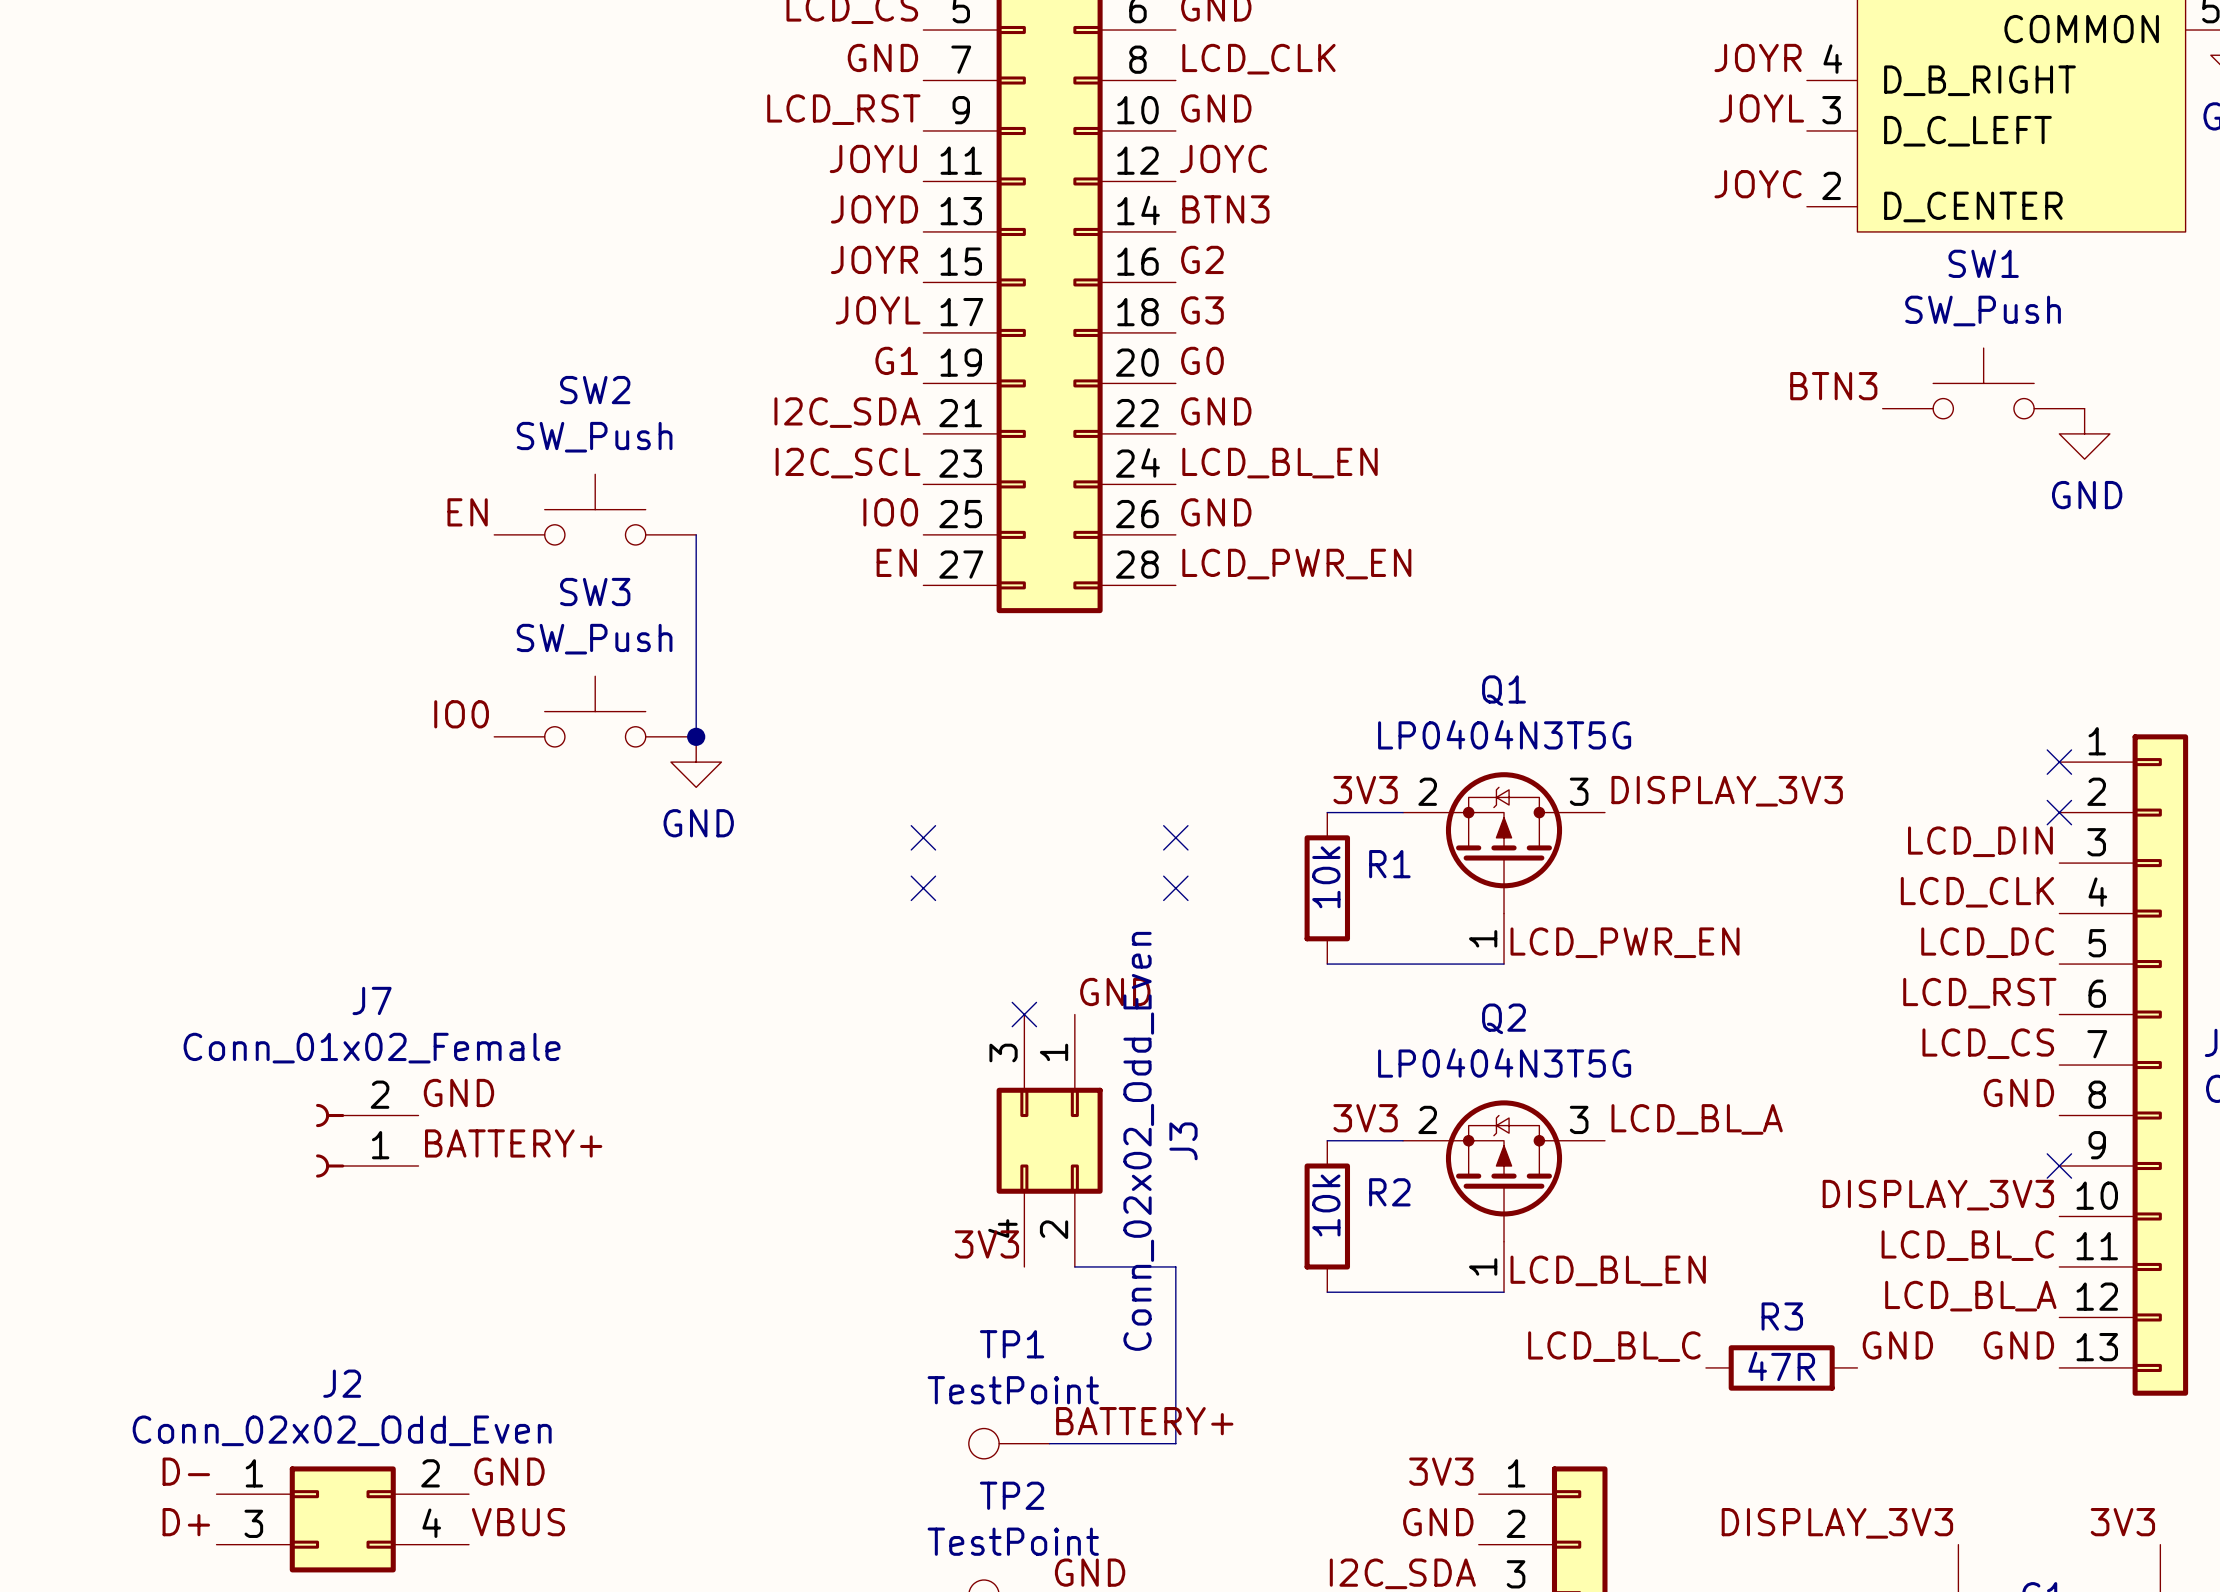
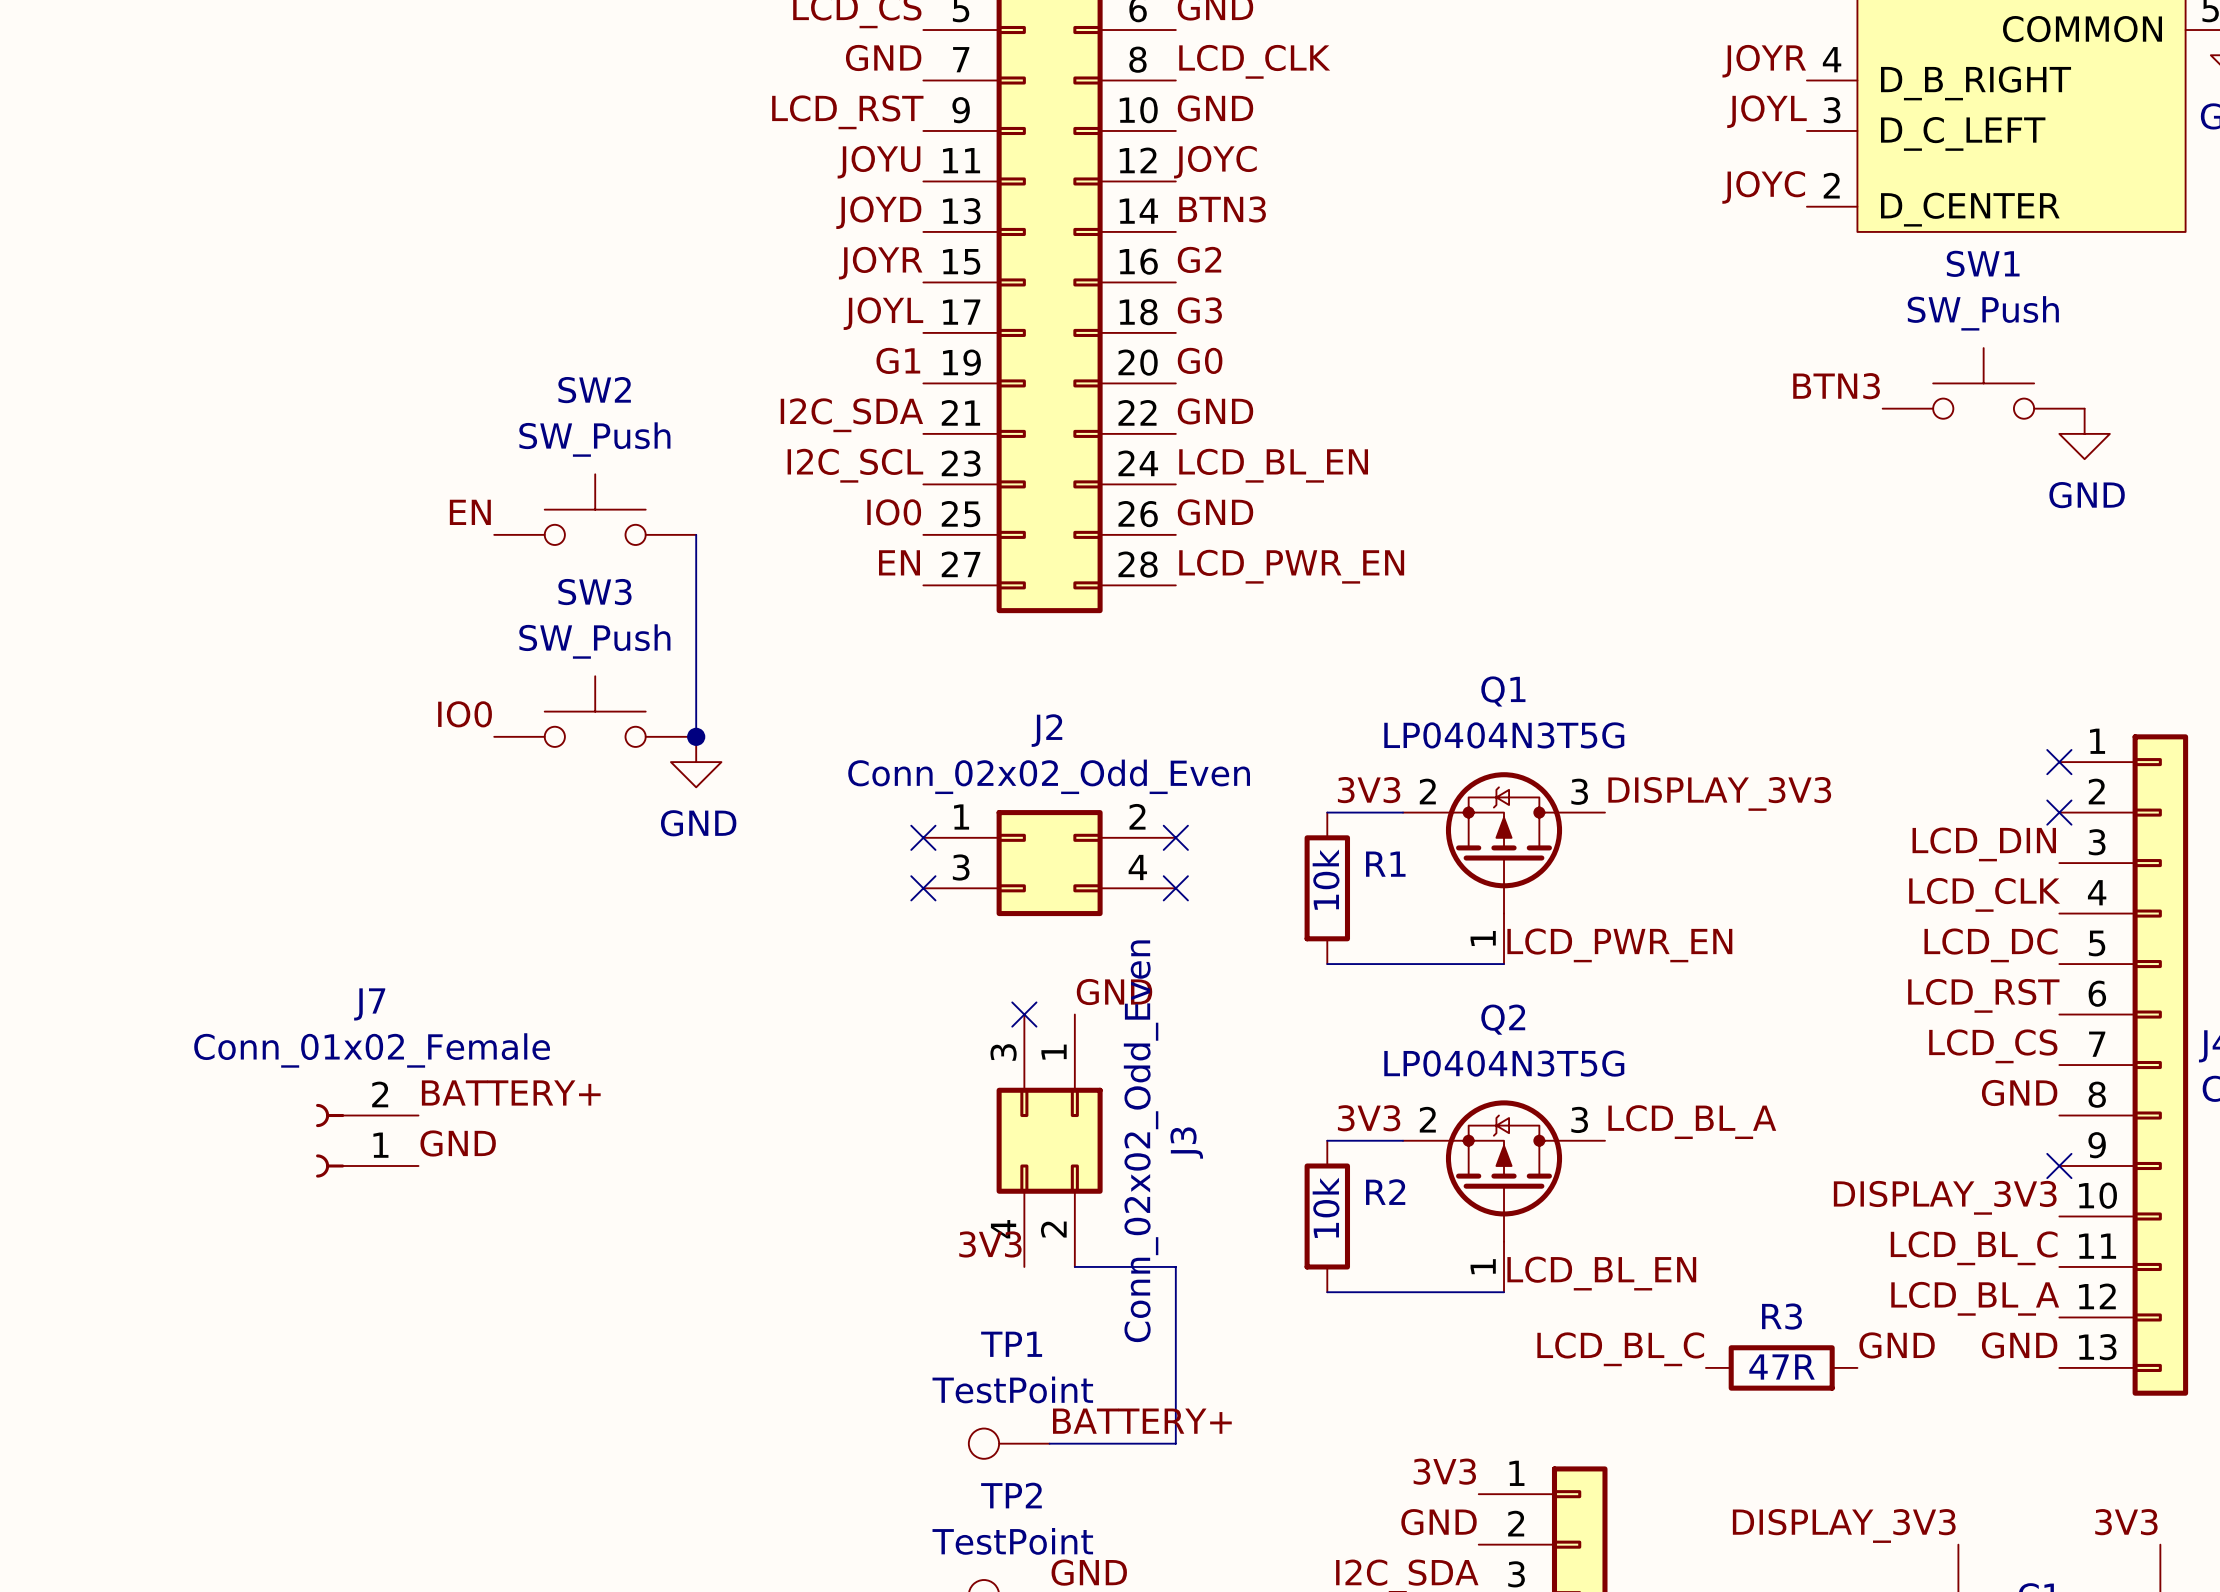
label: GND (458, 1092) -> BATTERY+ (511, 1092)
label: BATTERY+ (513, 1143) -> GND (458, 1143)
label: D- (186, 1471) -> none
label: GND (509, 1471) -> none
J2 position: (342, 1519) -> (1049, 863)
label: D+ (186, 1522) -> none
label: VBUS (518, 1522) -> none

